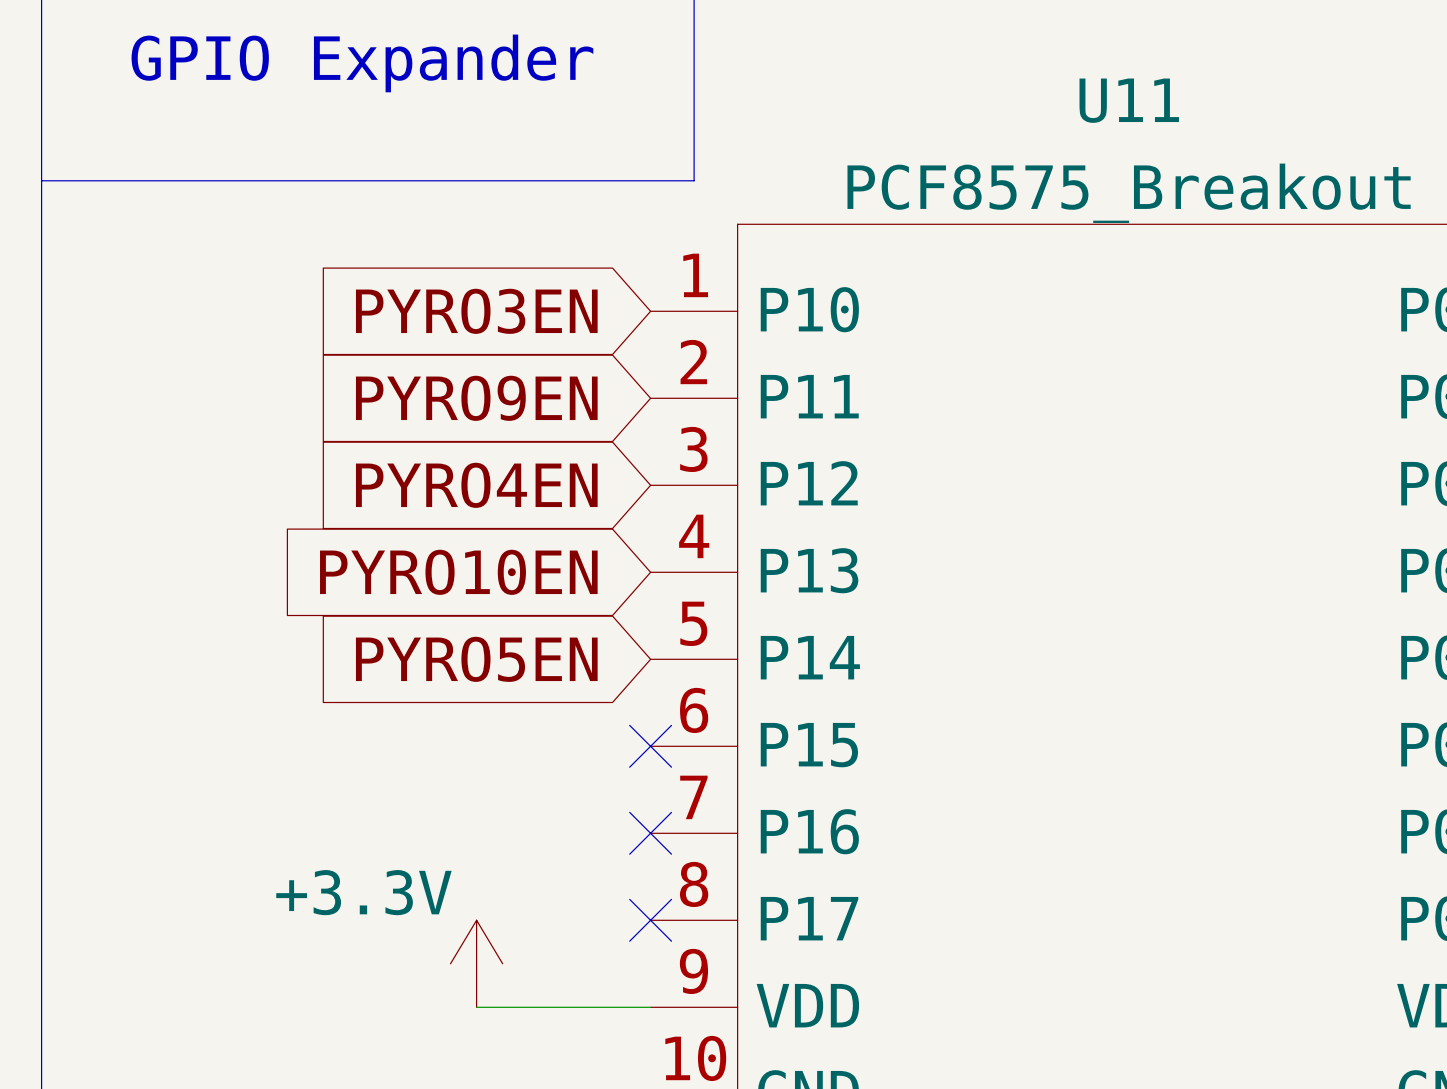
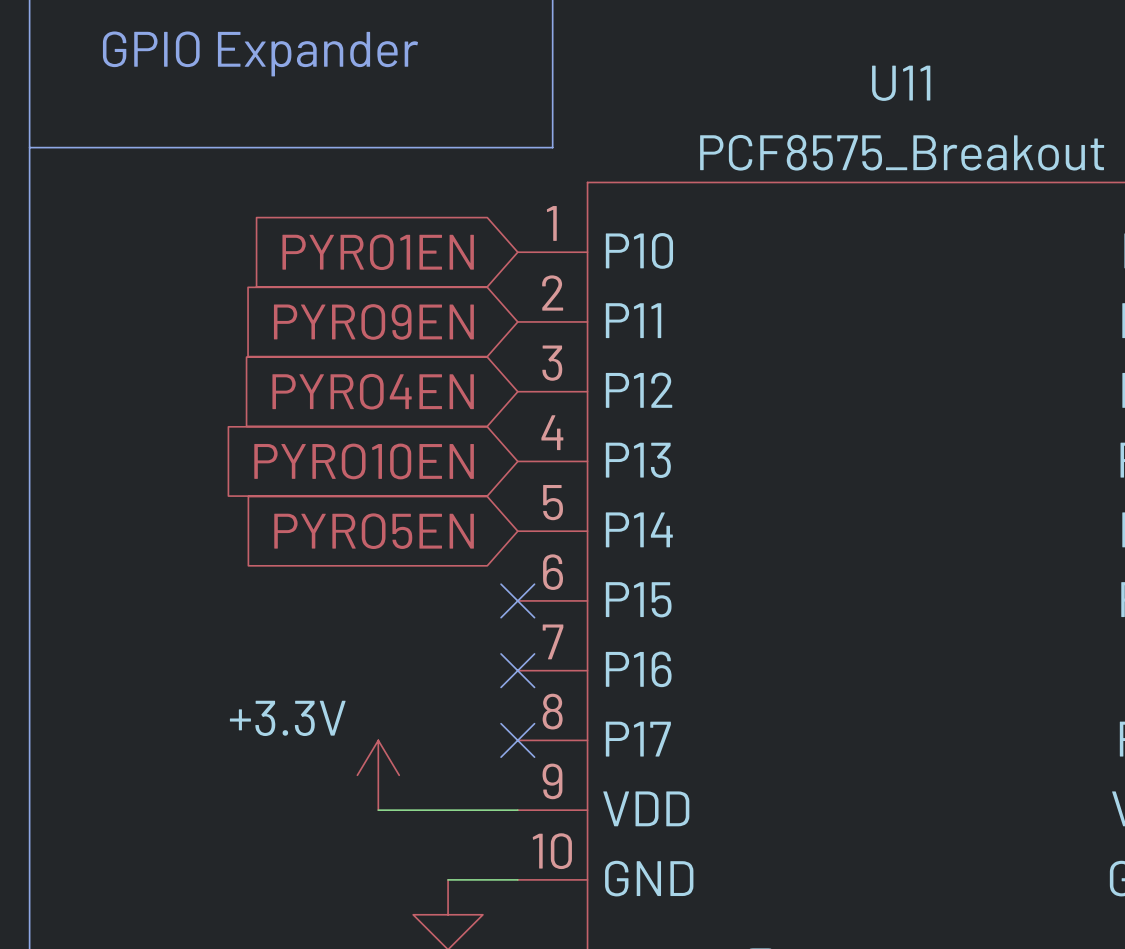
global label: PYRO3EN (476, 311) -> PYRO1EN (378, 252)

